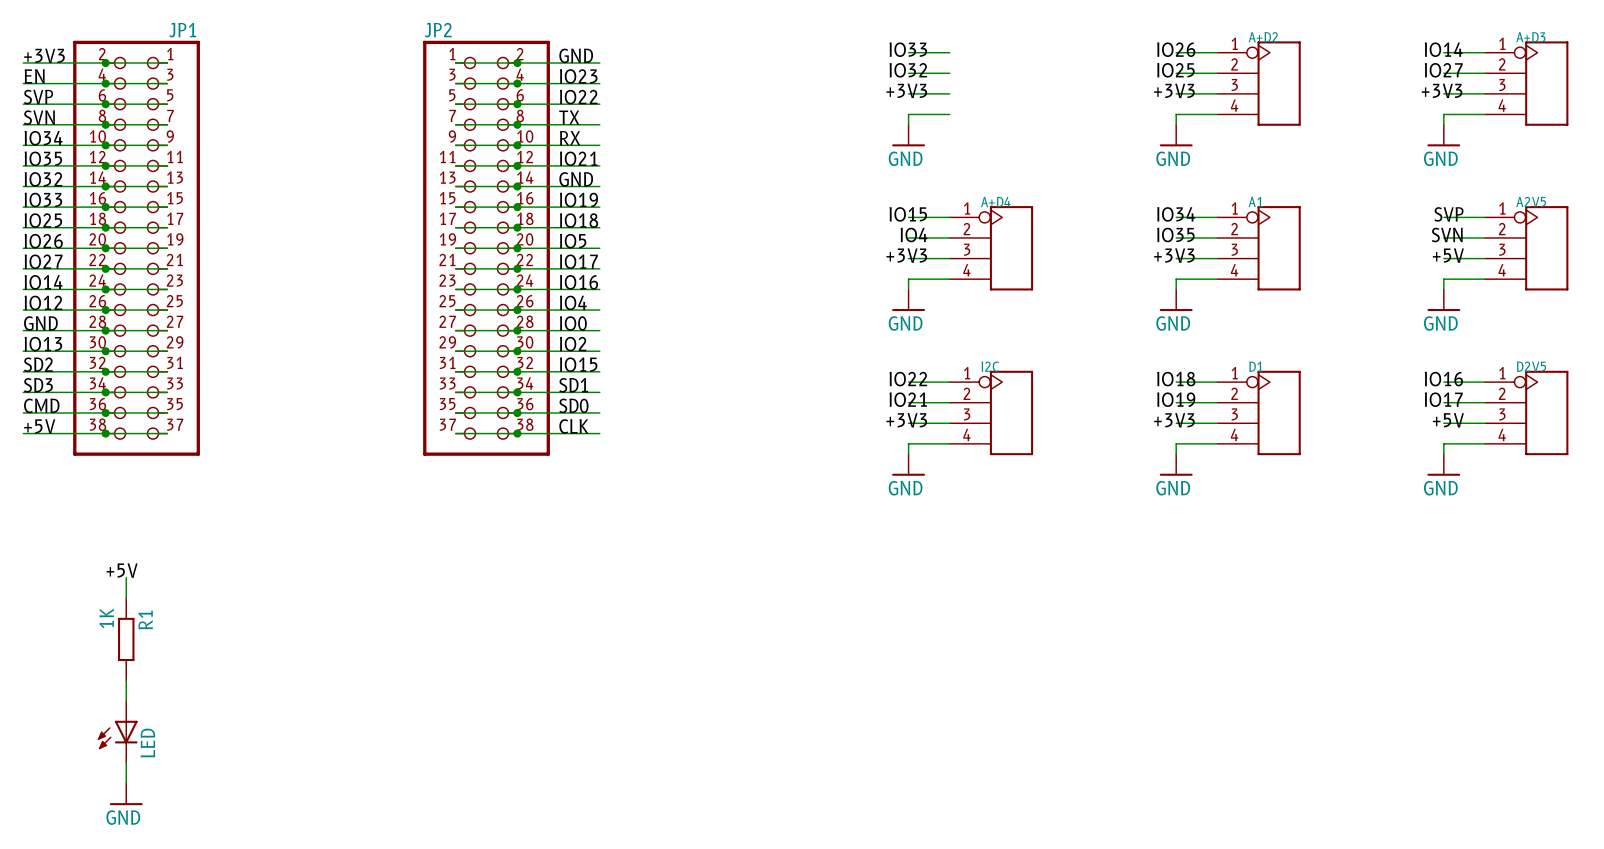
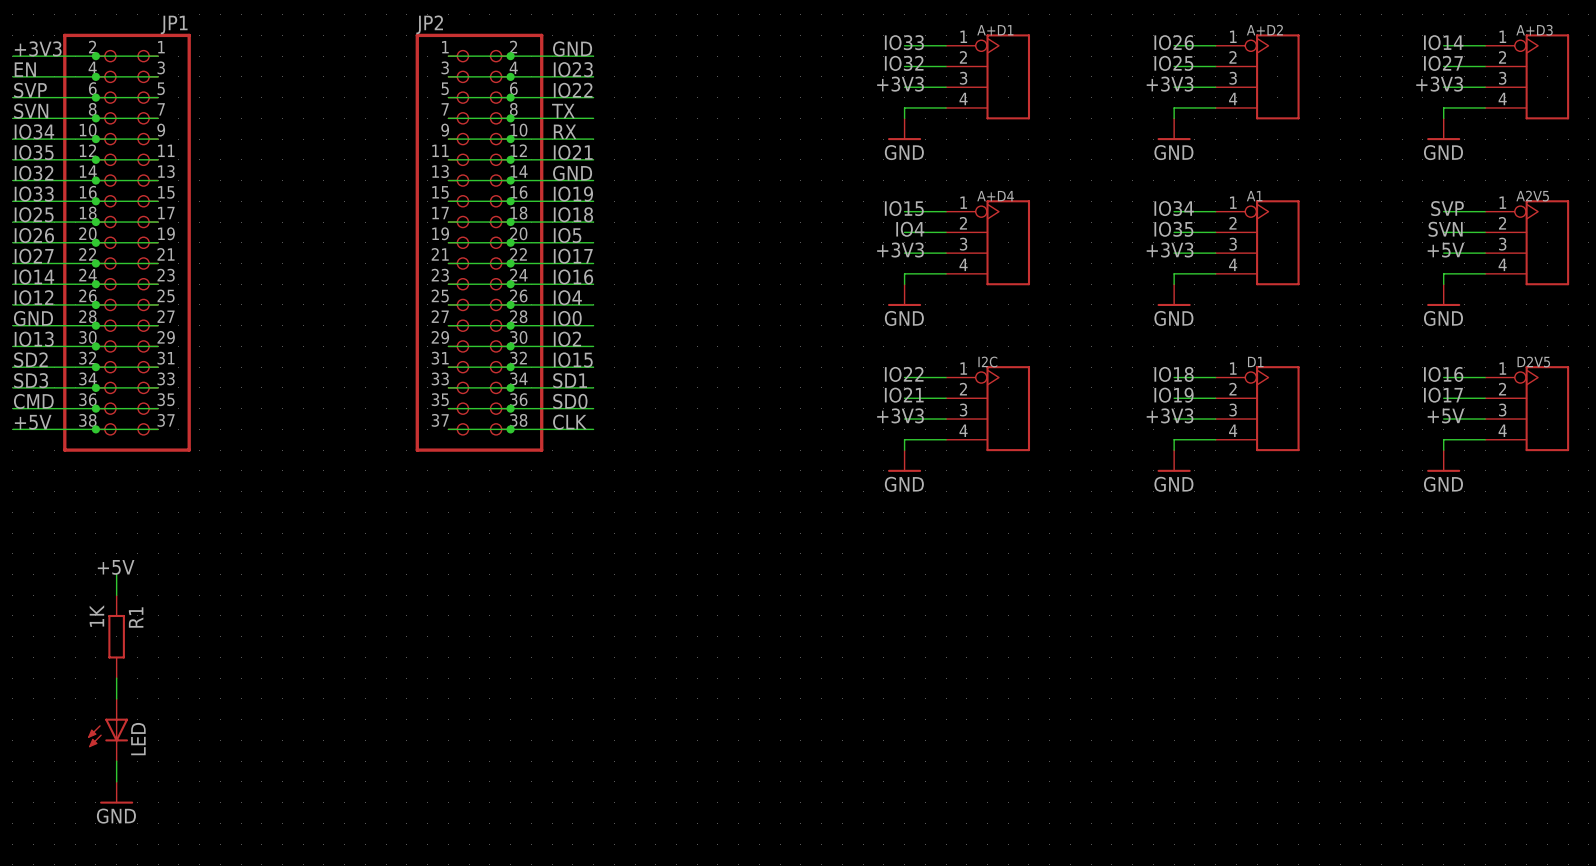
A+D1: none -> (988, 76)

